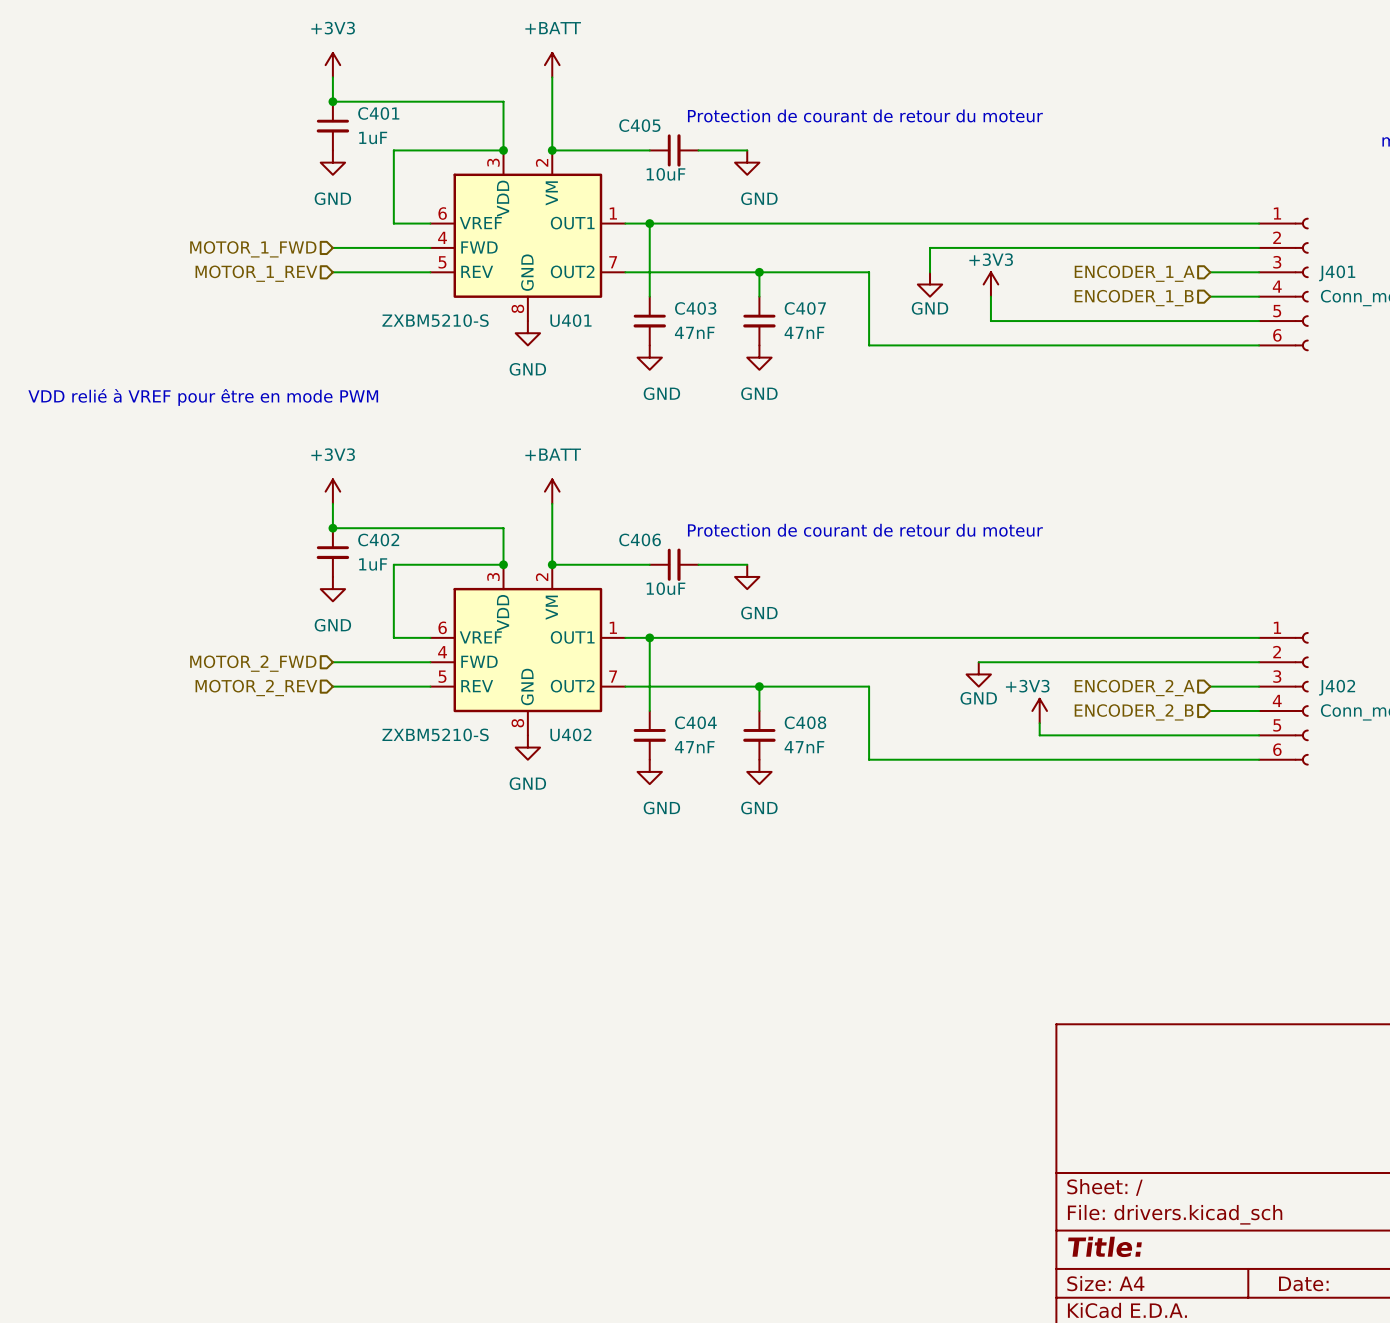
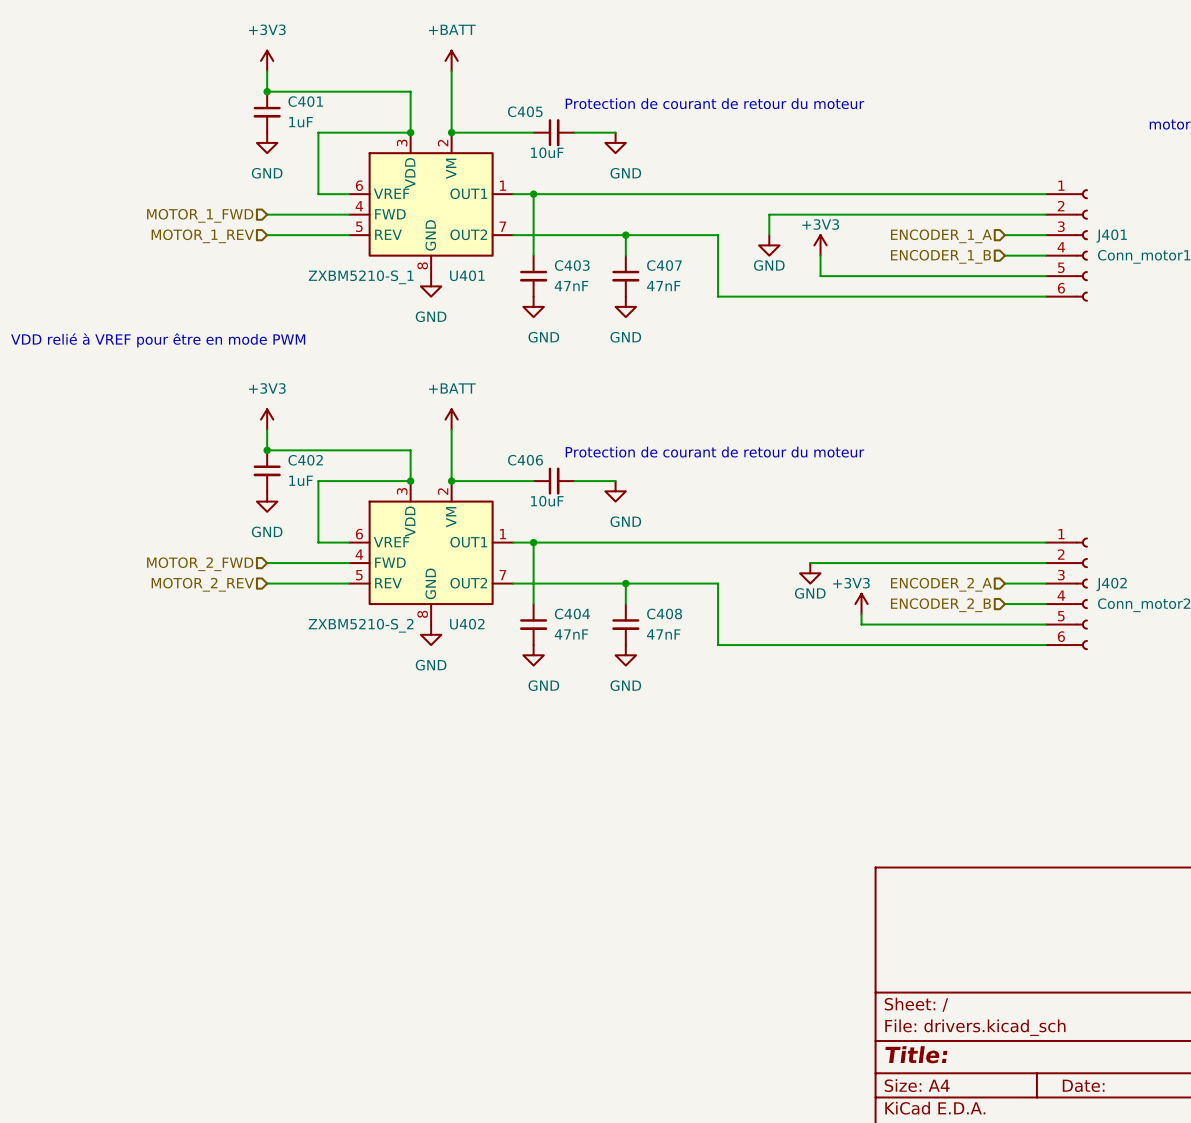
U401 value: ZXBM5210-S (435, 320) -> ZXBM5210-S_1 (361, 277)
U402 value: ZXBM5210-S (435, 734) -> ZXBM5210-S_2 (361, 625)

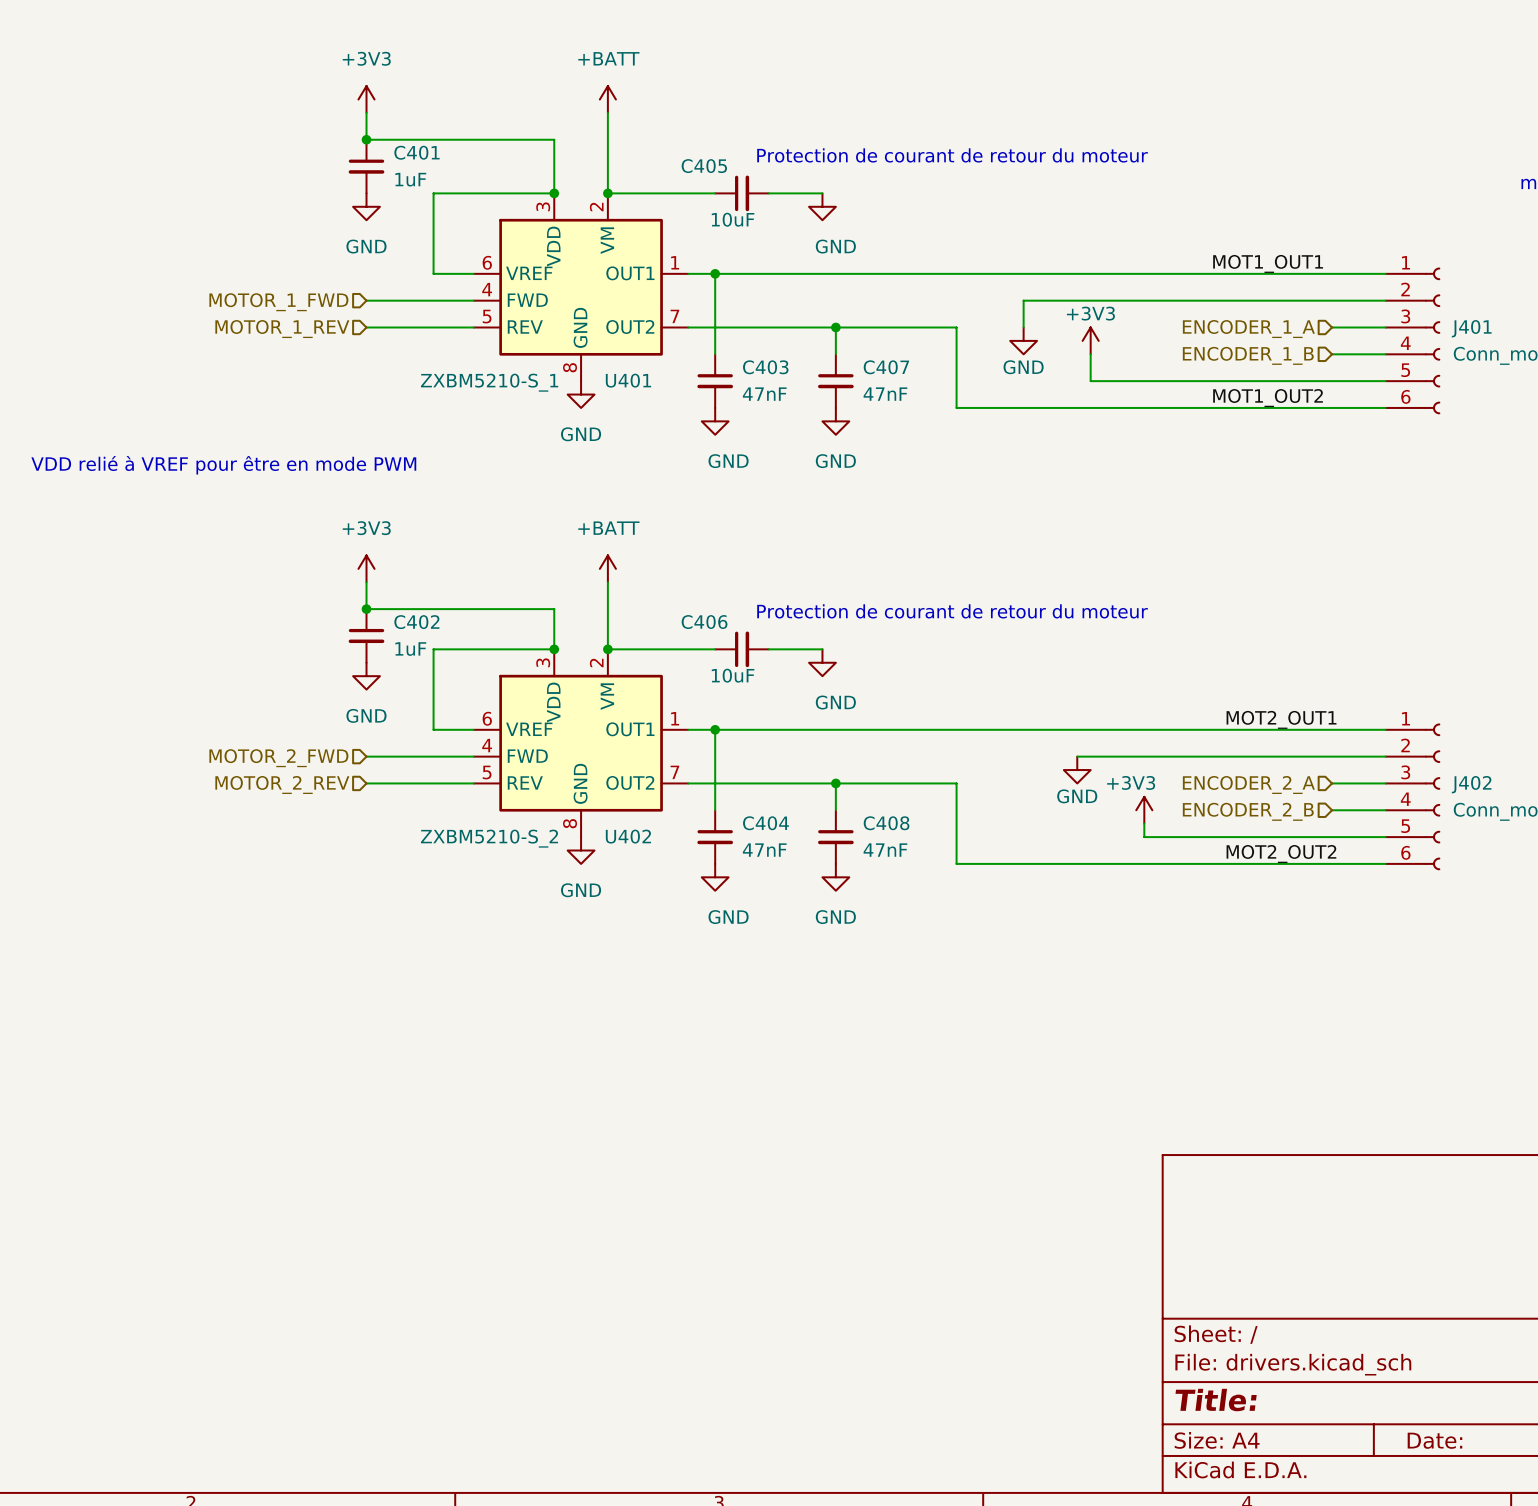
label: none -> MOT1_OUT1 (1268, 263)
label: none -> MOT1_OUT2 (1268, 398)
label: none -> MOT2_OUT1 (1281, 719)
label: none -> MOT2_OUT2 (1281, 853)

